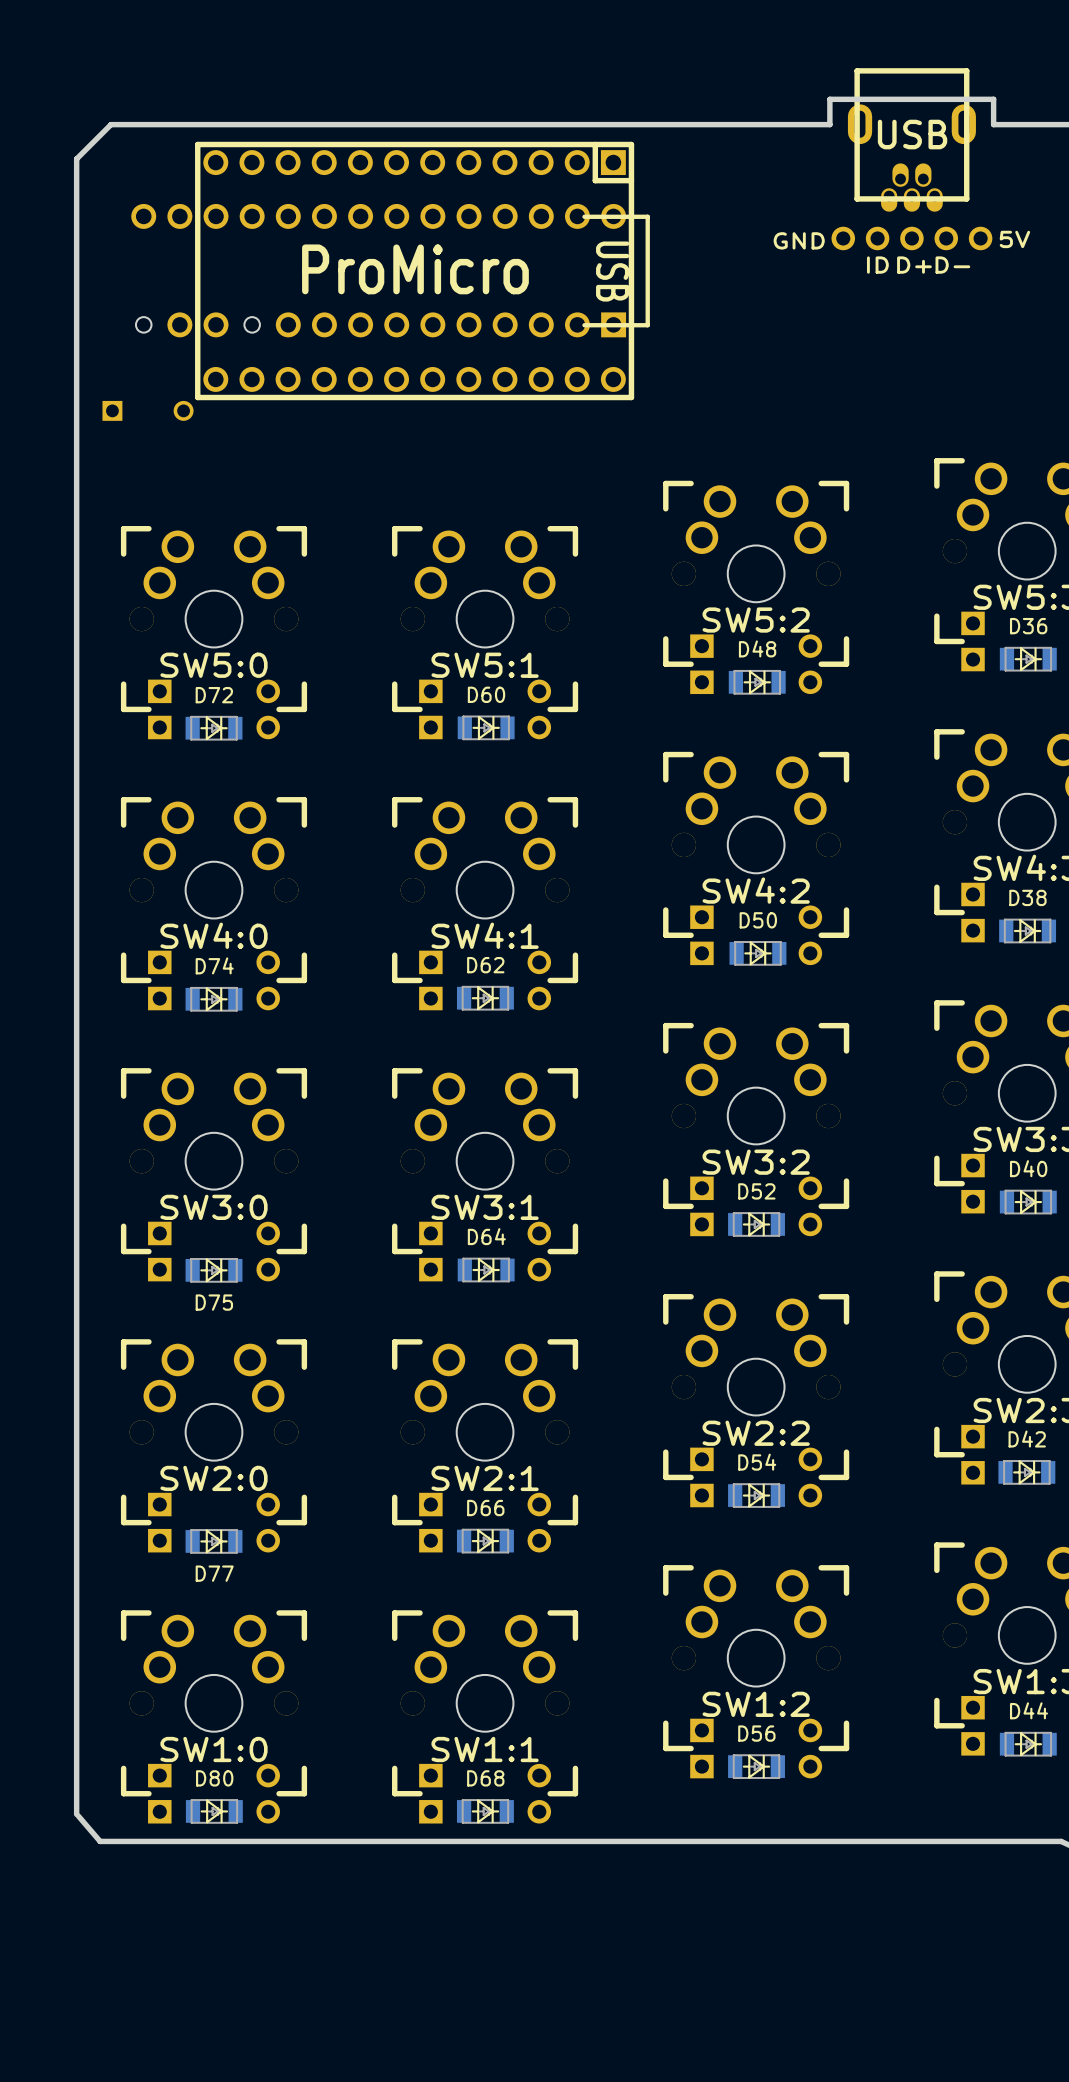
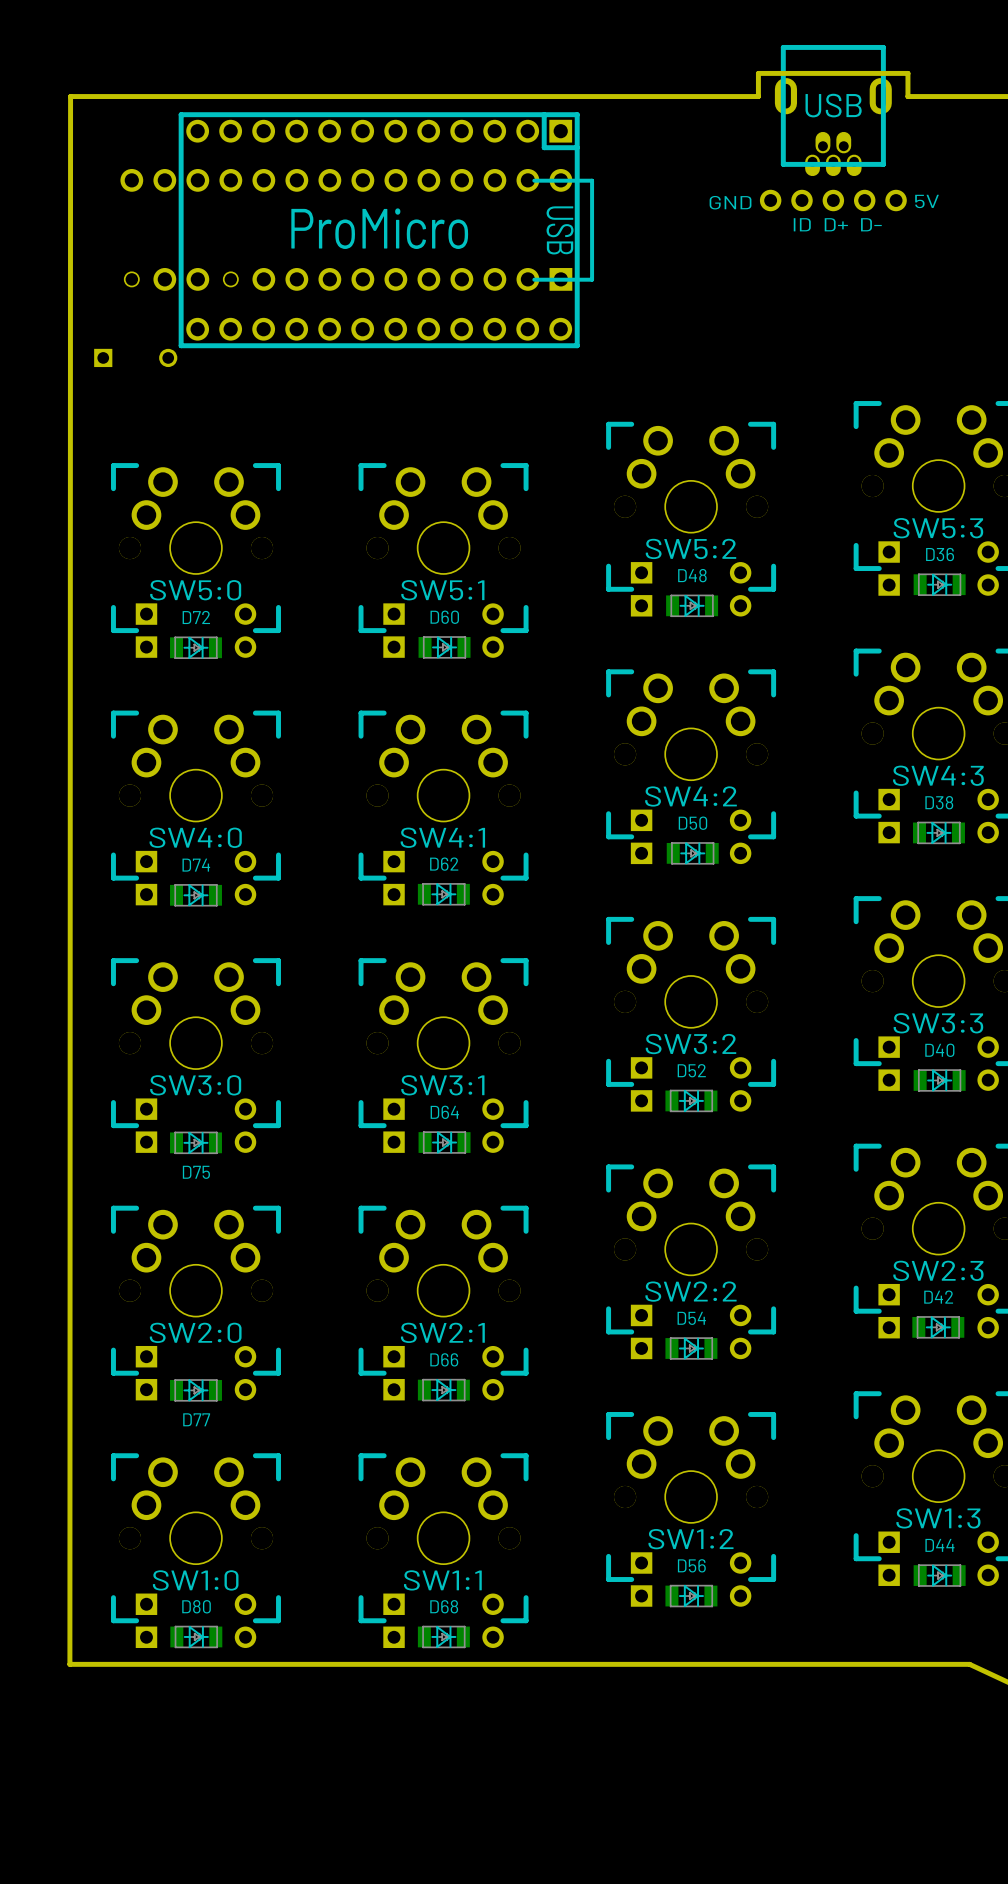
board edge: (110, 124) (76, 158) (76, 1814) -> (101, 96) (70, 96) (69, 1664) (92, 1664)
board edge: (78, 1816) (100, 1841) -> none

